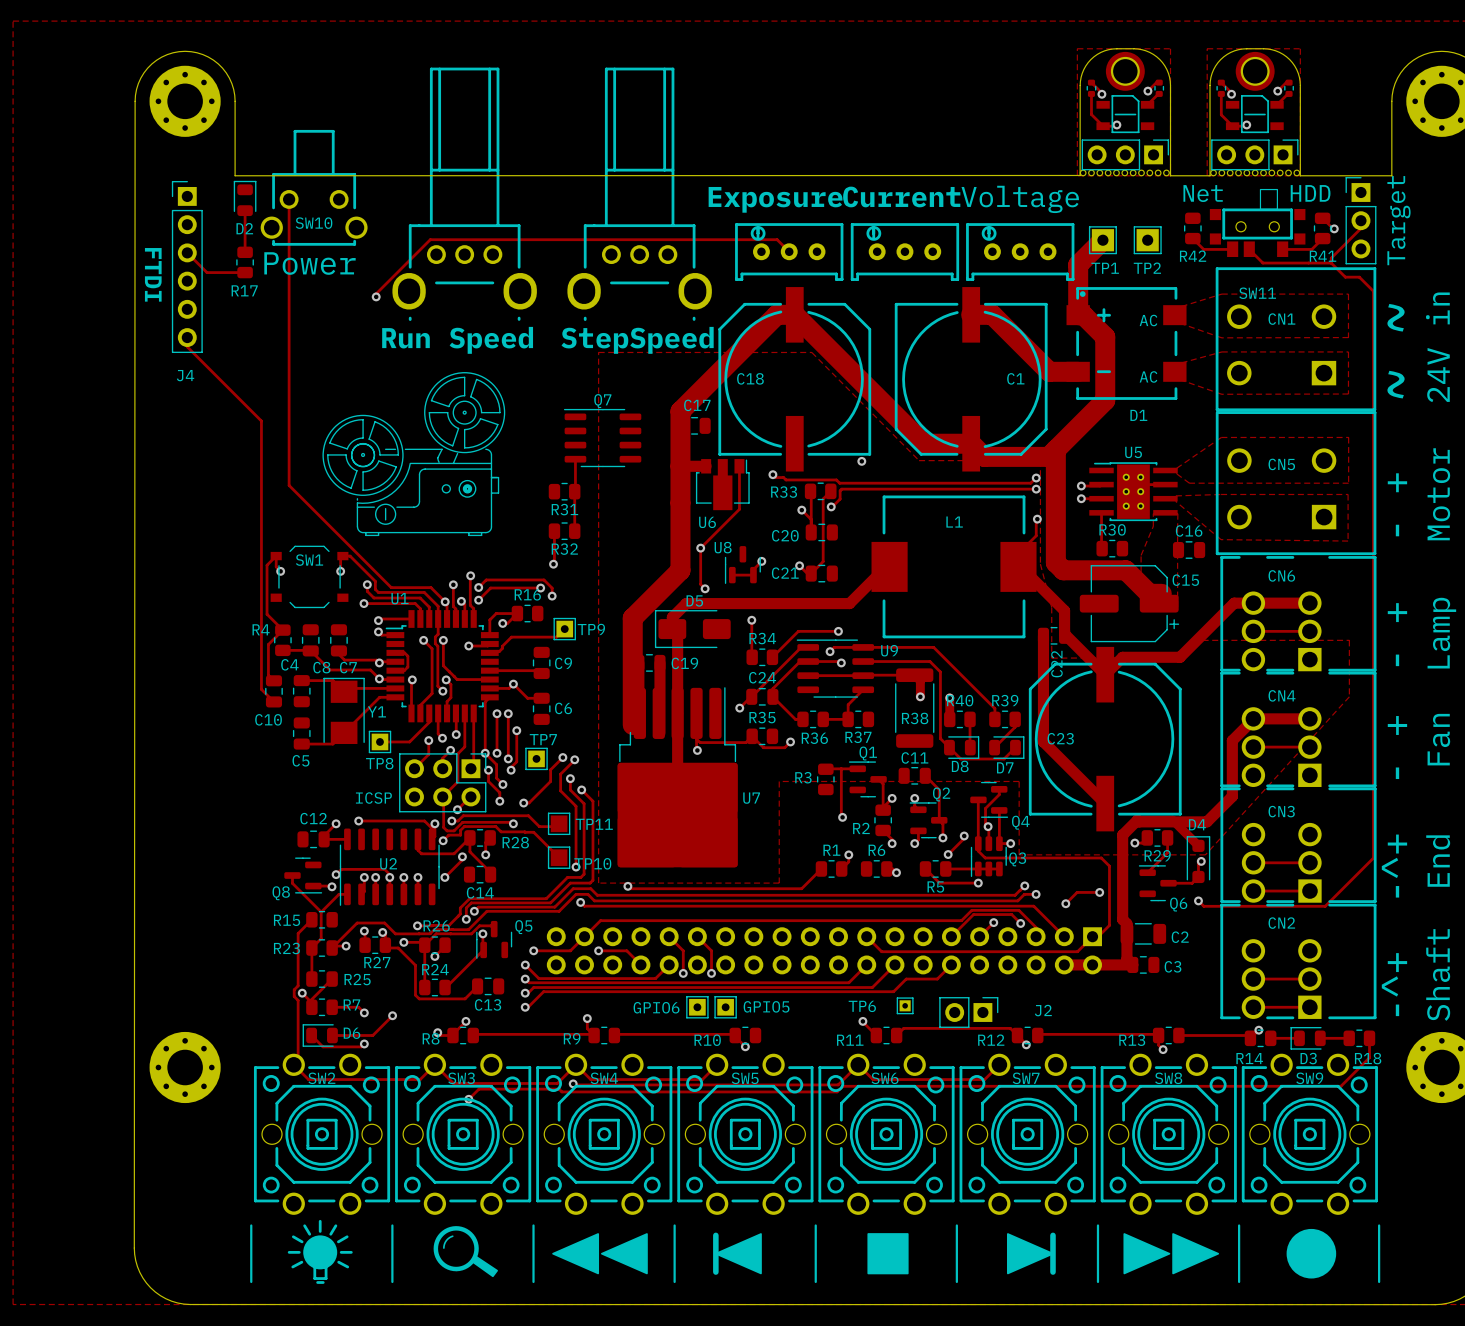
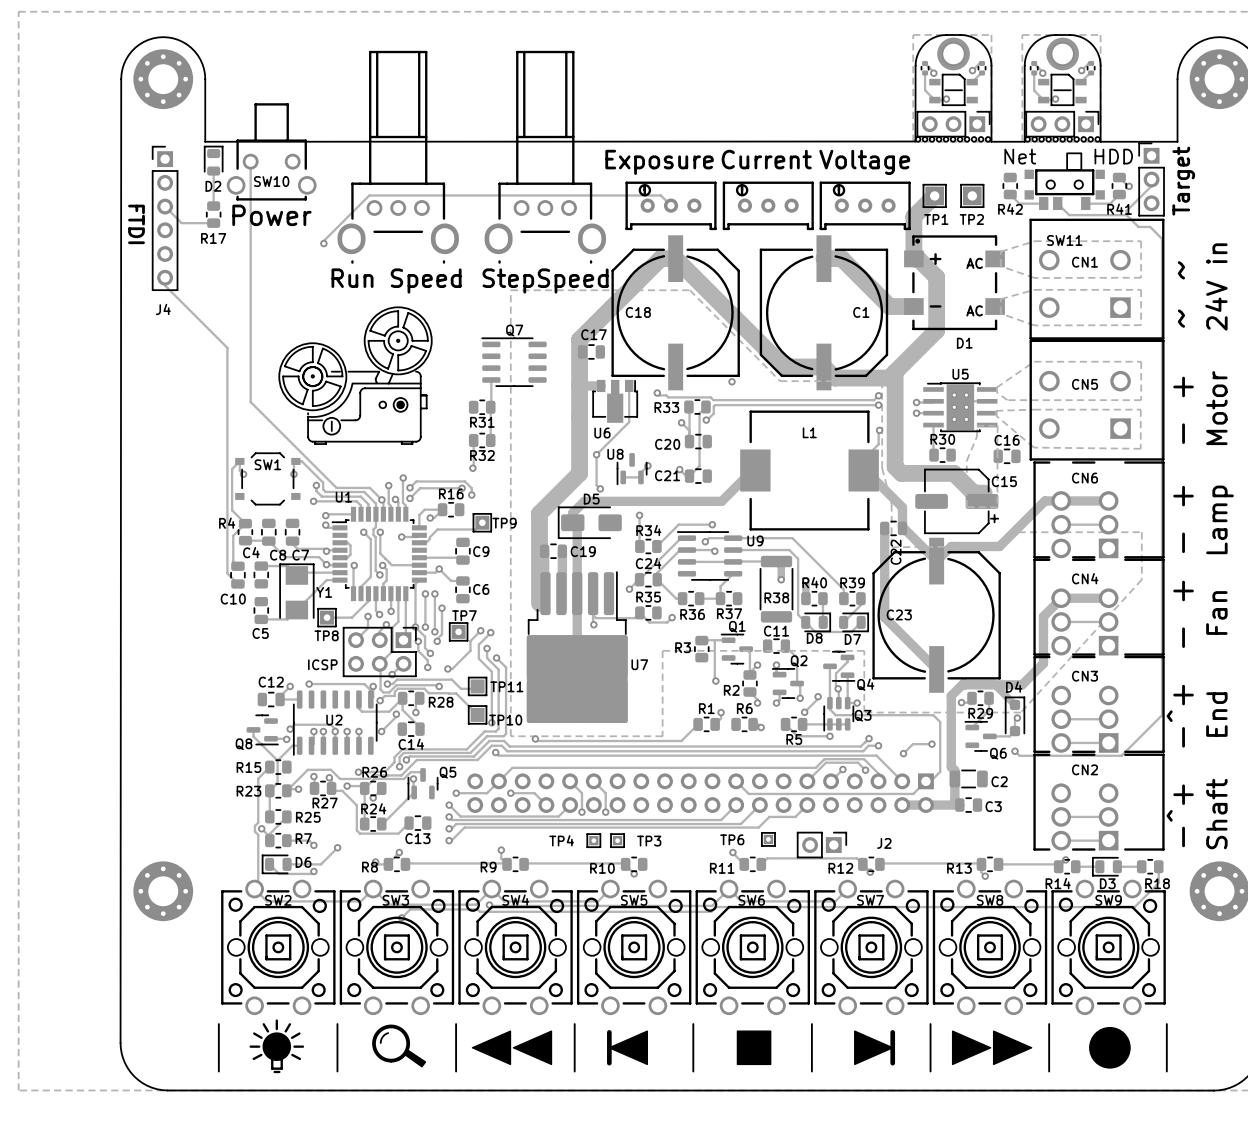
part: (697, 1007) -> none
TP4: none -> (593, 840)
part: (725, 1007) -> none
TP3: none -> (617, 840)

